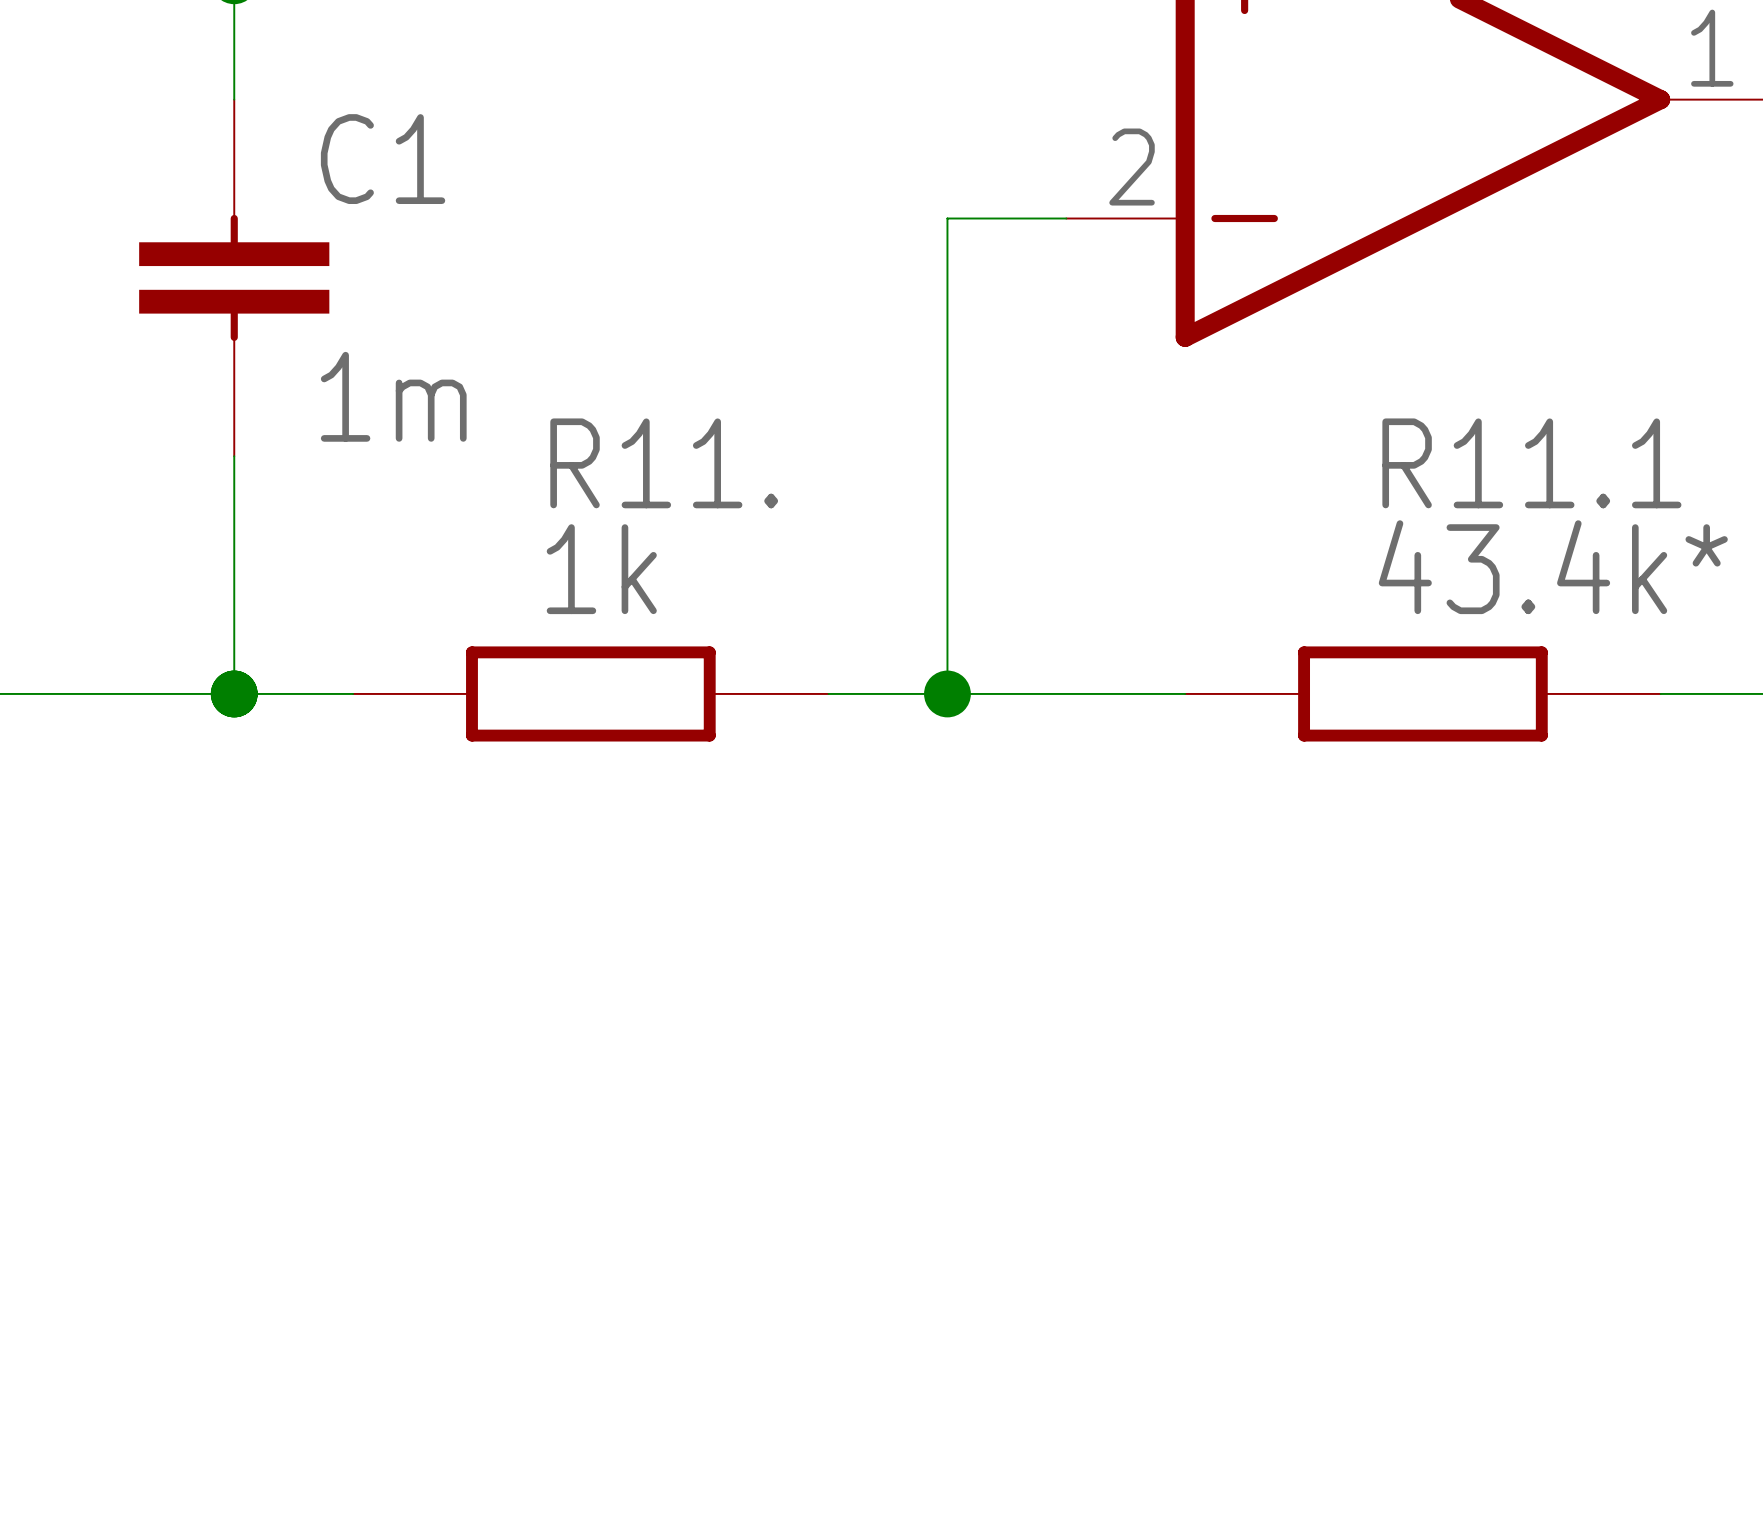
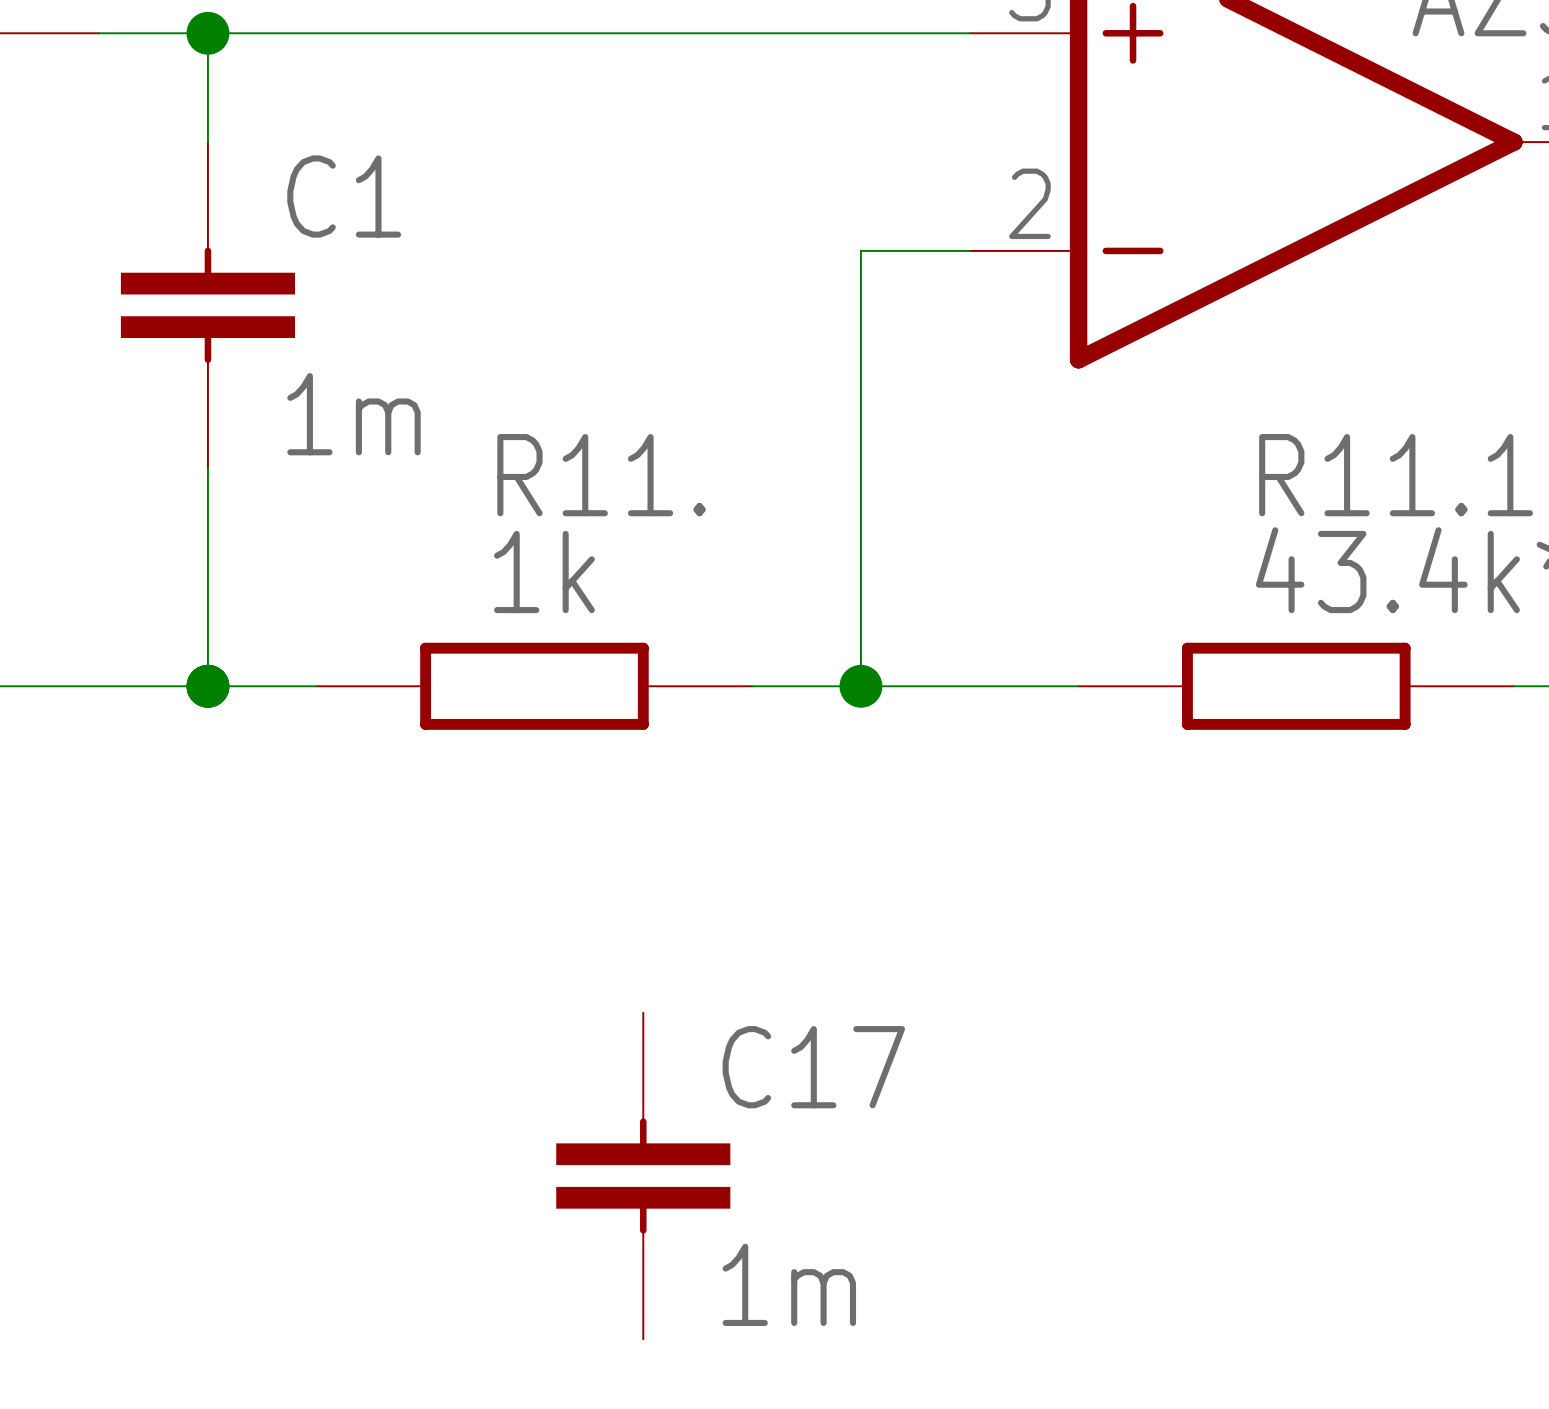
C17: none -> 1m (643, 1176)

